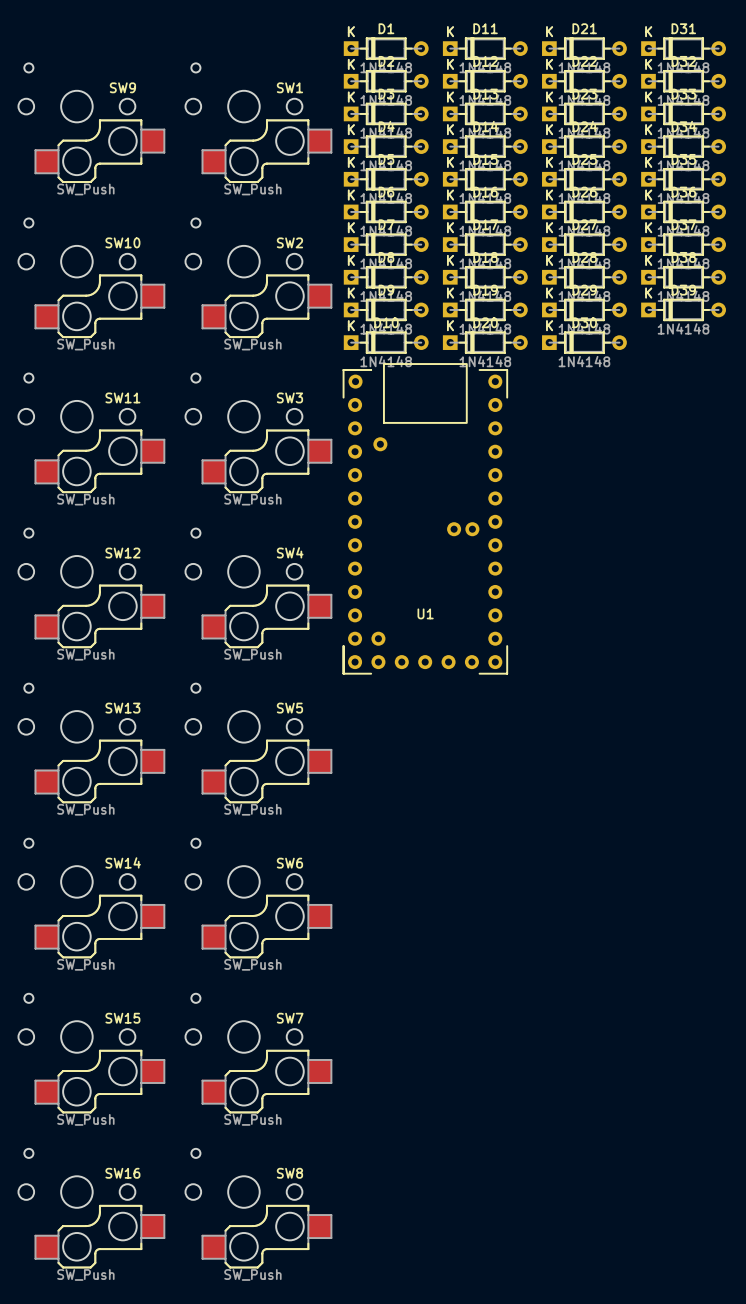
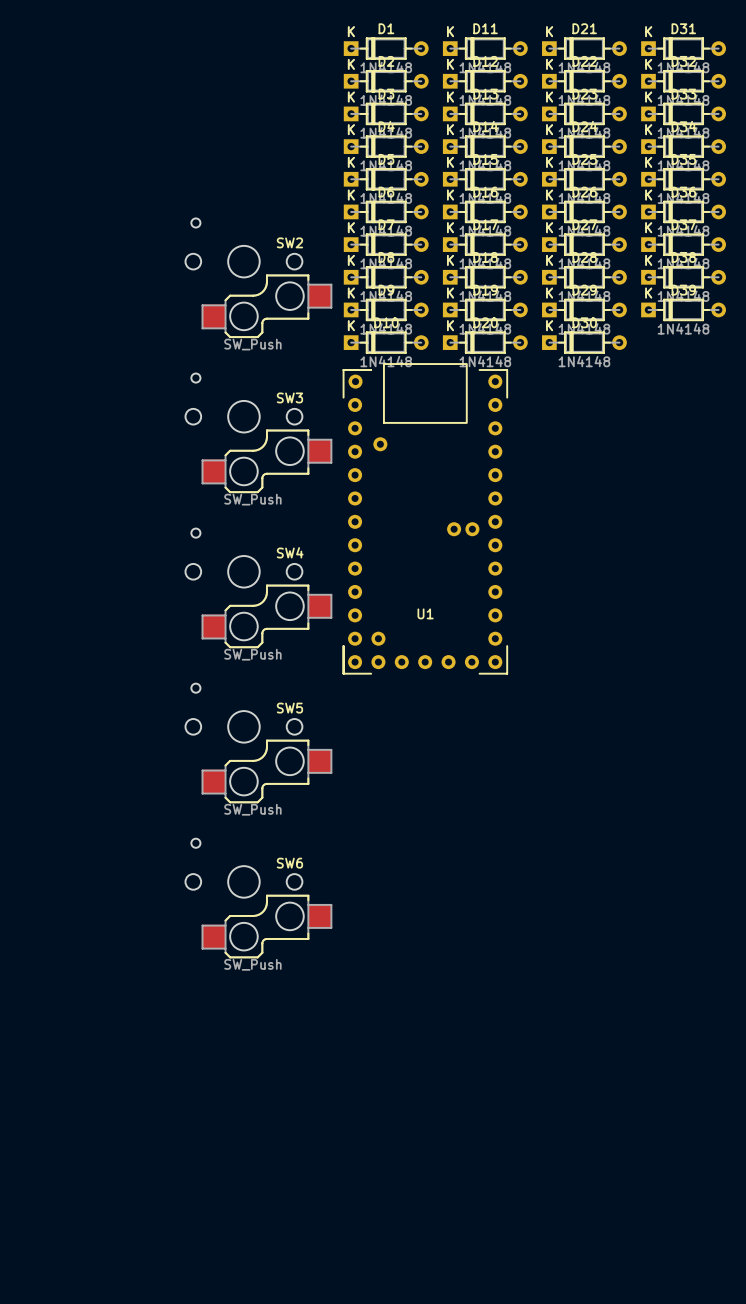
SW9: SW_Push (91, 123) -> none
SW1: SW_Push (258, 123) -> none
SW10: SW_Push (91, 278) -> none
SW11: SW_Push (91, 433) -> none
SW12: SW_Push (91, 588) -> none
SW13: SW_Push (91, 743) -> none
SW14: SW_Push (91, 898) -> none
SW15: SW_Push (91, 1053) -> none
SW7: SW_Push (258, 1053) -> none
SW16: SW_Push (91, 1208) -> none
SW8: SW_Push (258, 1208) -> none

